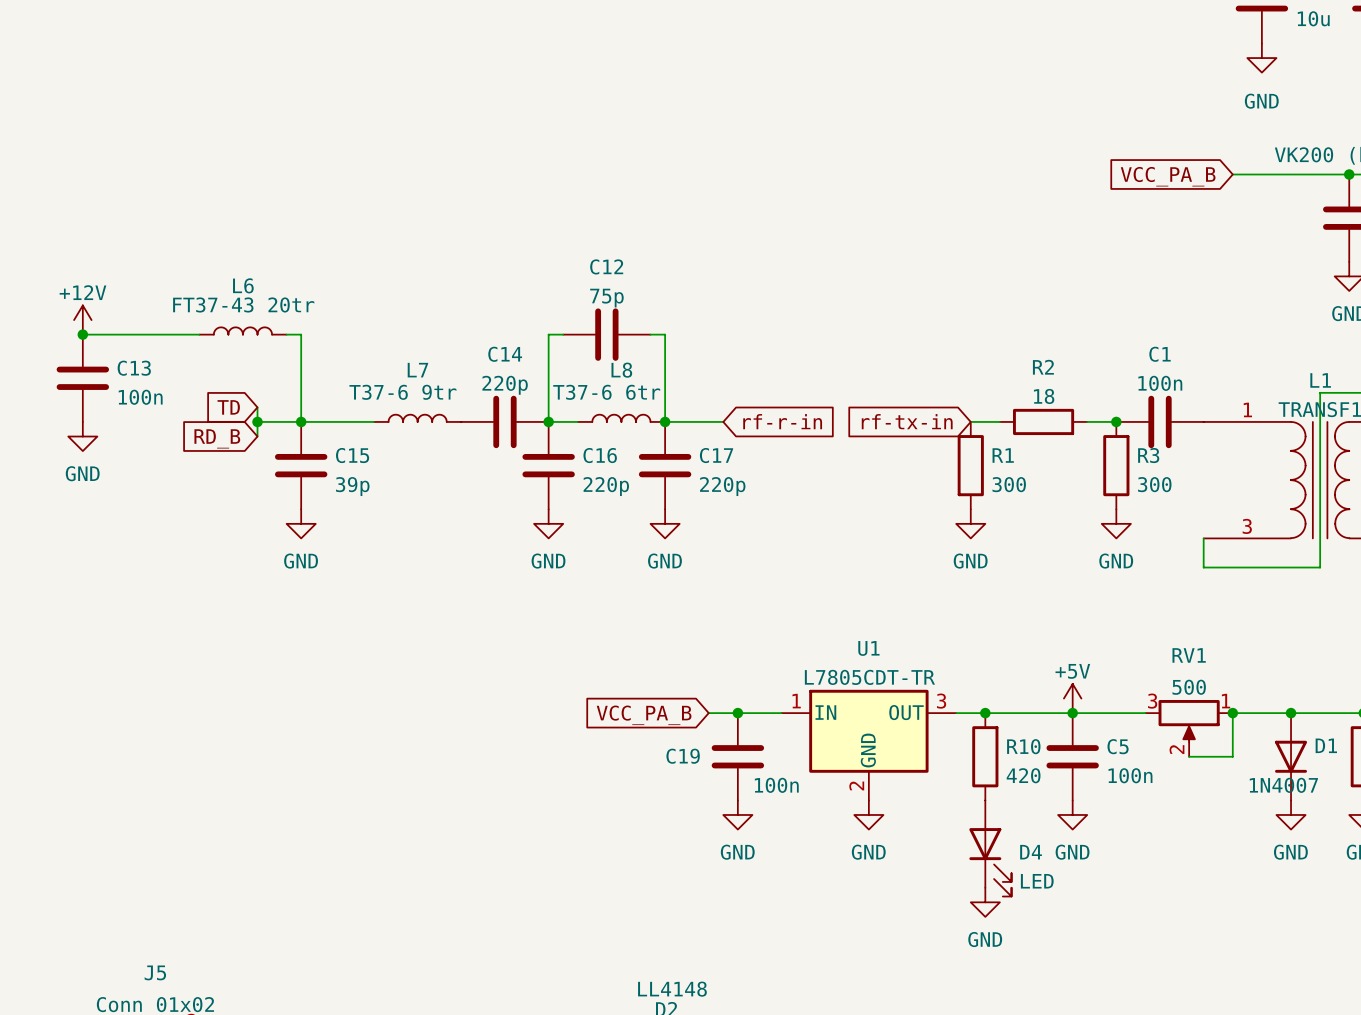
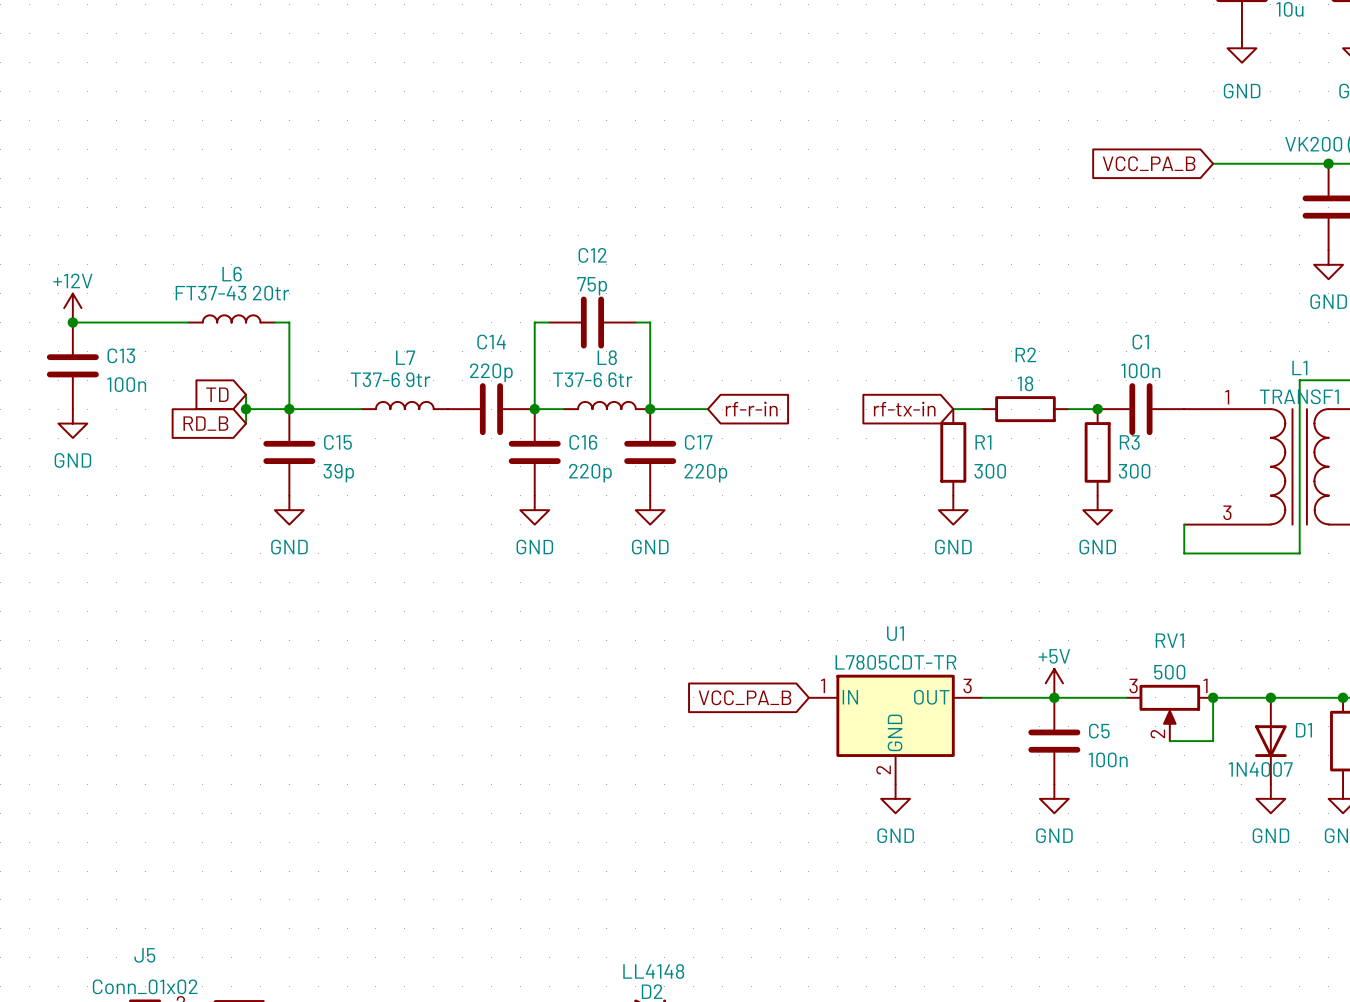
wire: (708, 713) (781, 713) -> none
junction: (737, 713) -> none
junction: (985, 713) -> none
global label position: VCC_PA_B (644, 715) -> VCC_PA_B (744, 697)
U1 position: (868, 745) -> (895, 729)
C19: 100n (737, 756) -> none
R10: 420 (985, 756) -> none
power symbol: GND (737, 814) -> none
power symbol position: GND (868, 814) -> GND (895, 798)
D4: LED (990, 848) -> none
power symbol: GND (985, 902) -> none

